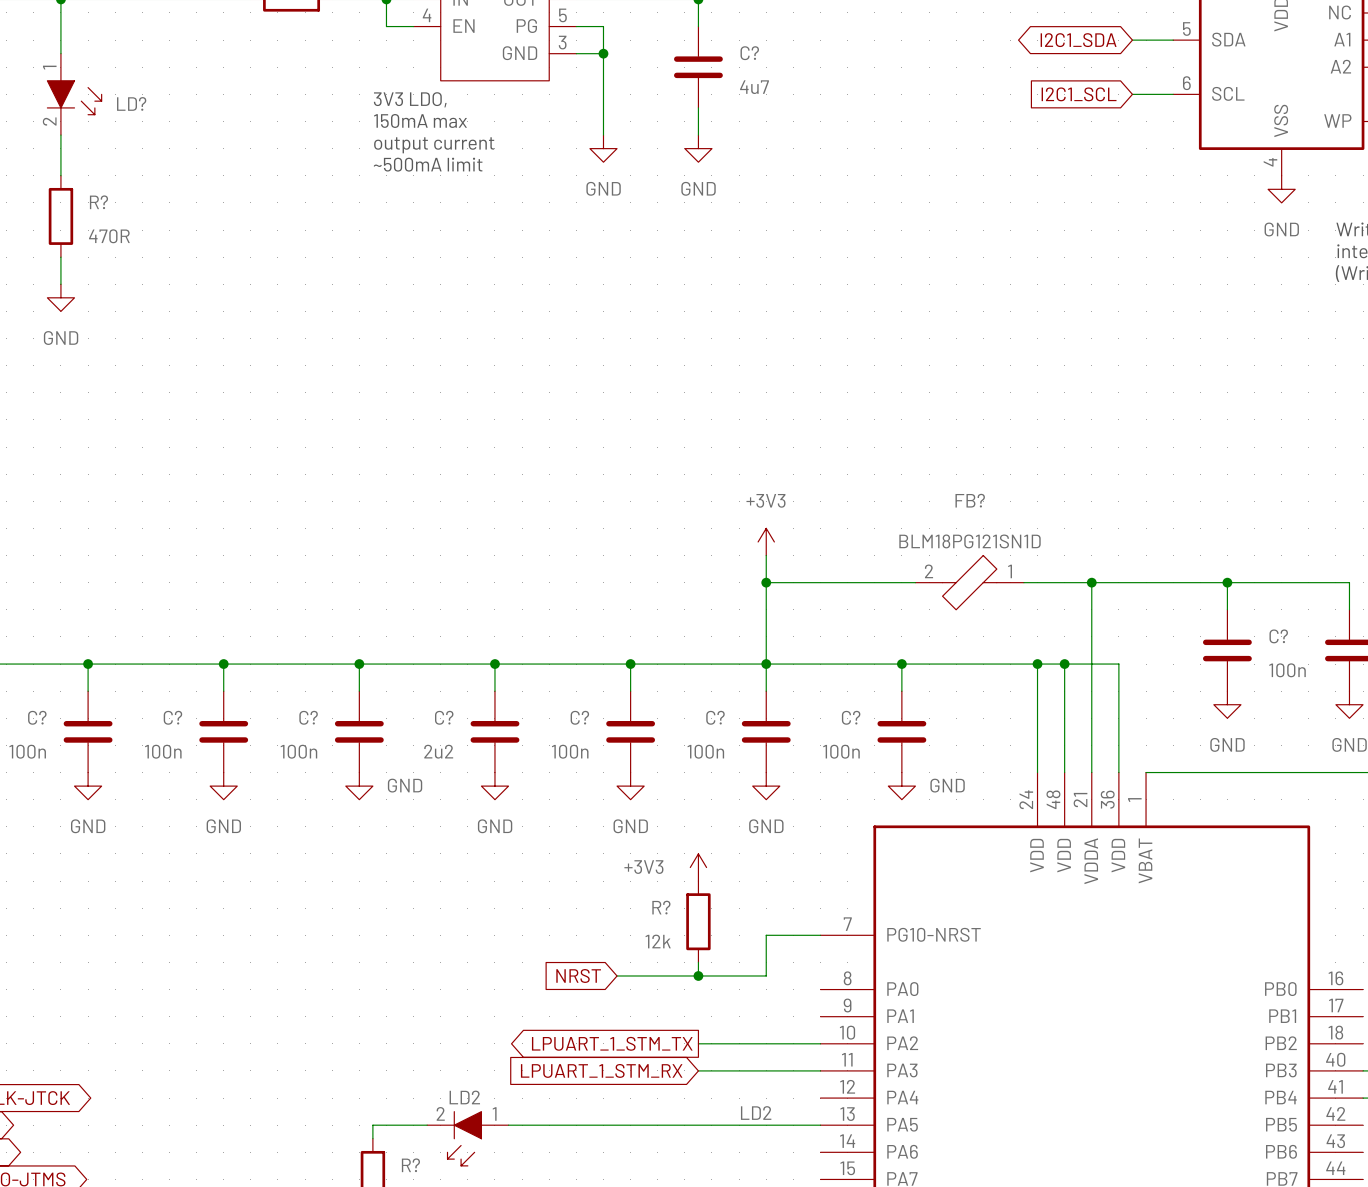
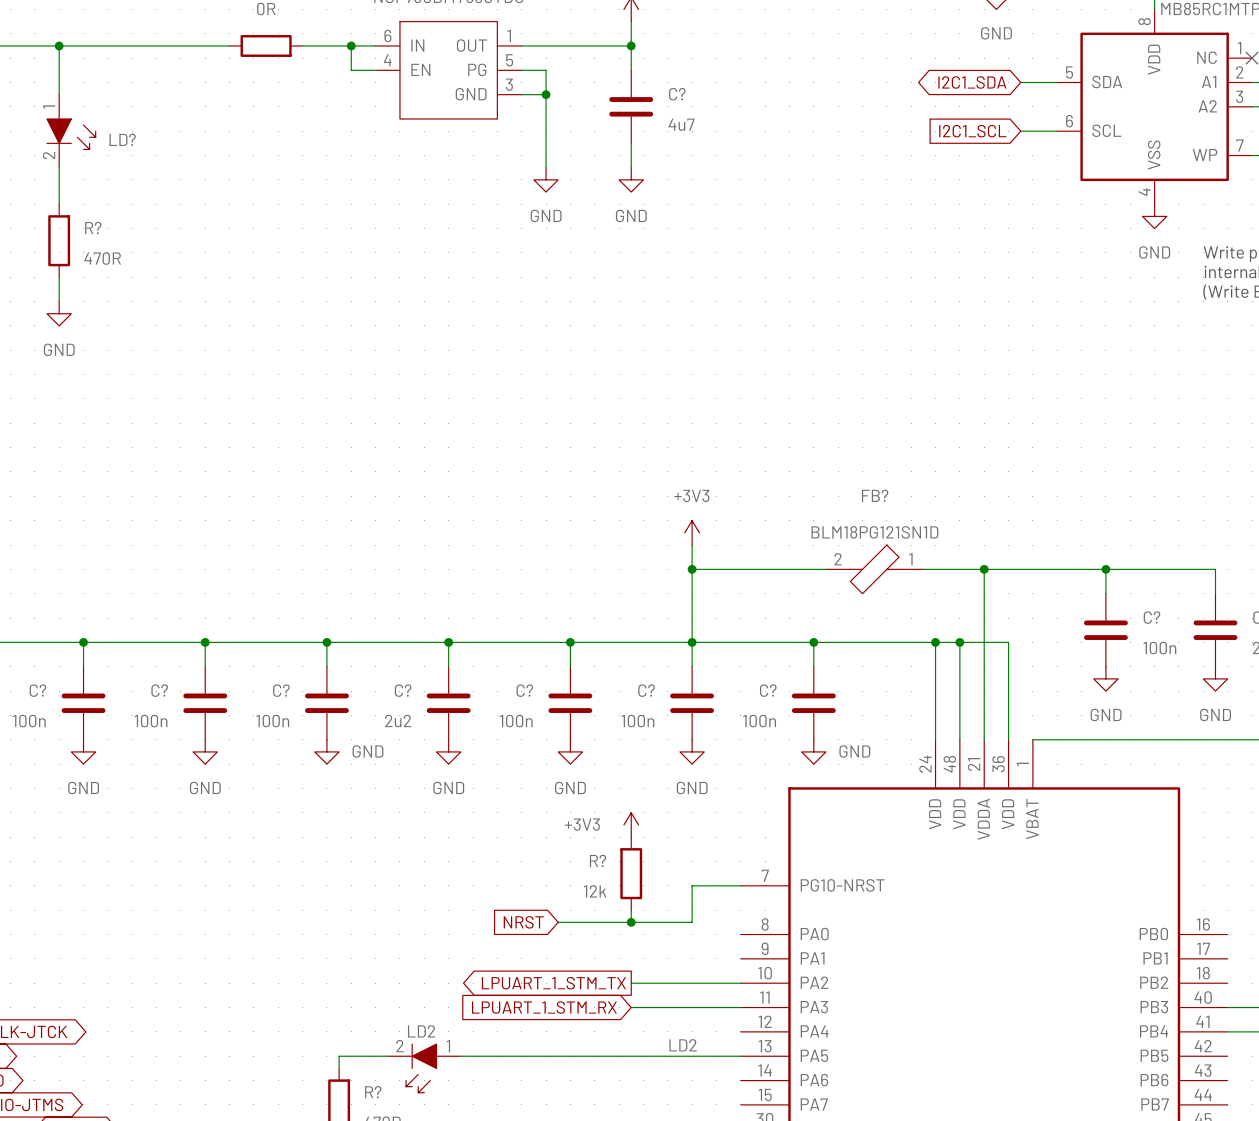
text: 3V3 LDO, (410, 99) -> none
text: 150mA max (420, 120) -> none
text: output current (434, 145) -> none
text: ~500mA limit (428, 164) -> none

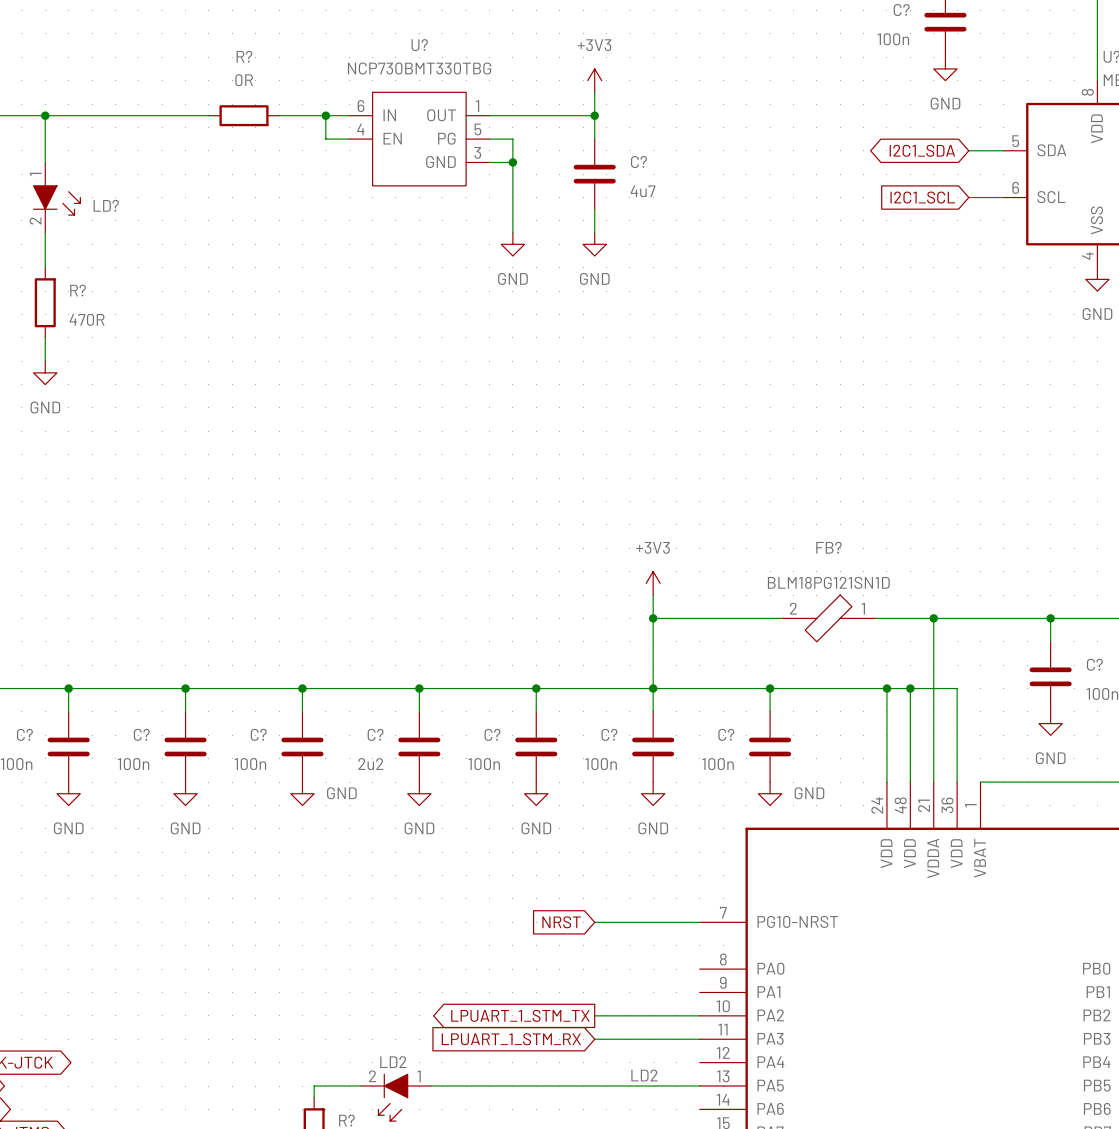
power symbol: +3V3 (631, 824) -> none
R?: (631, 873) -> none
wire: (692, 885) (692, 922) (558, 922) -> (653, 922) (594, 922)
wire: (631, 910) (631, 922) -> none
global label position: NRST (523, 922) -> NRST (561, 922)
junction: (631, 922) -> none

